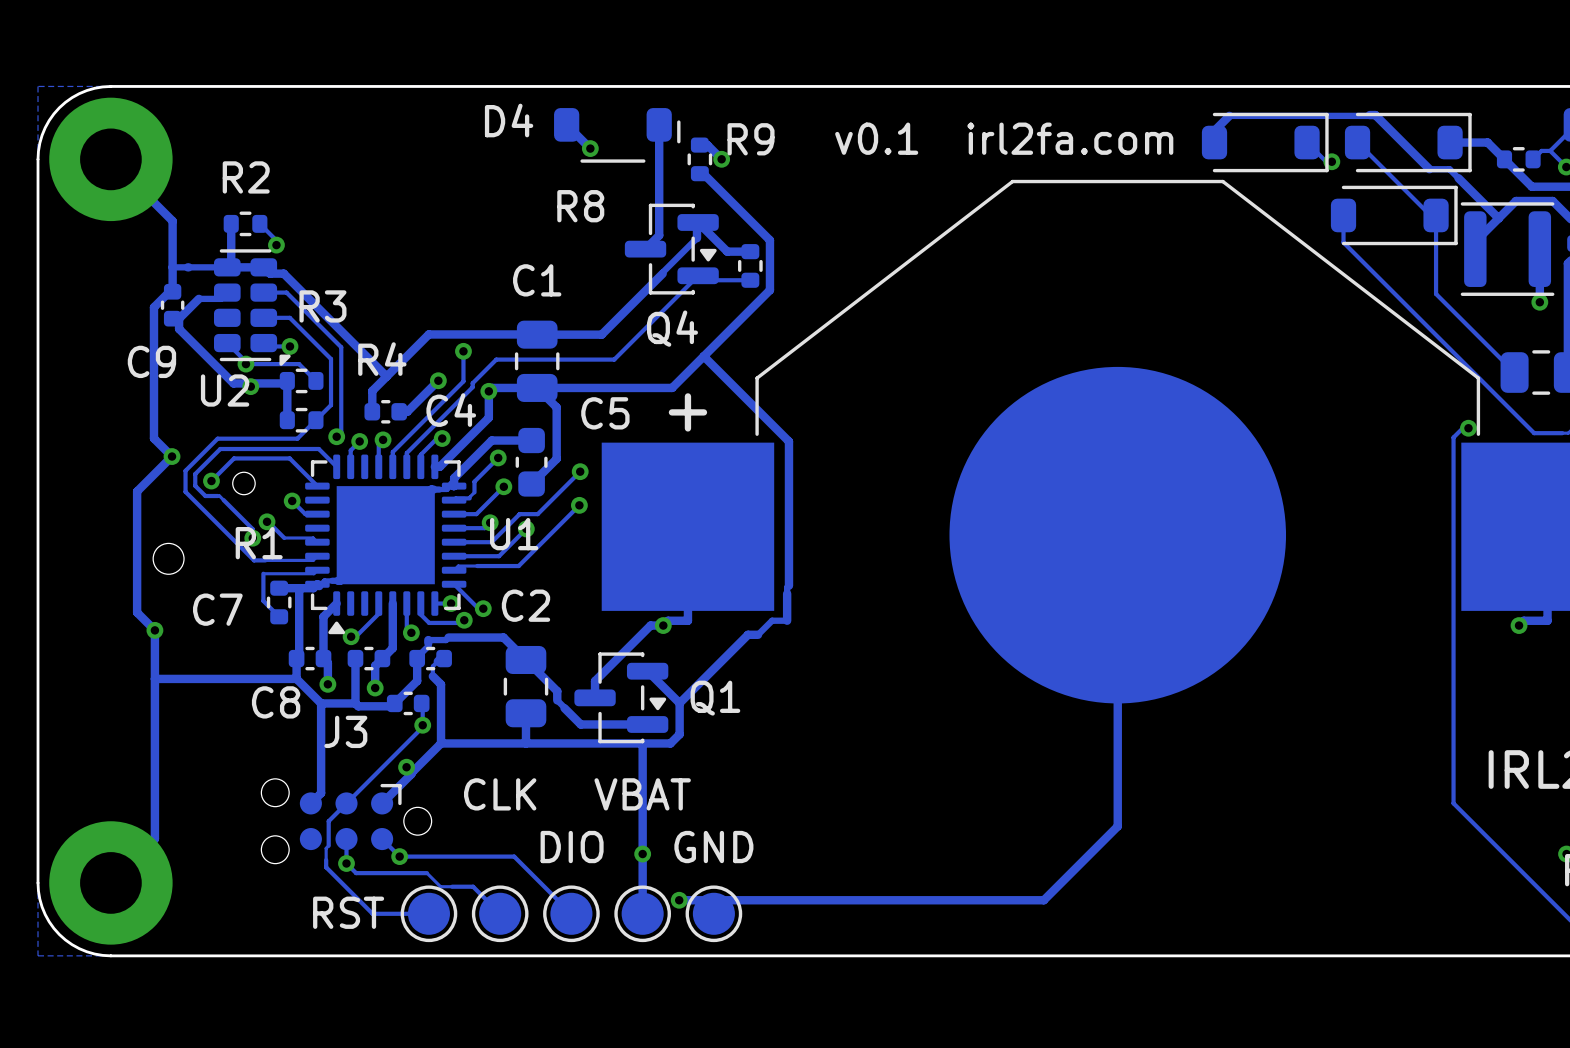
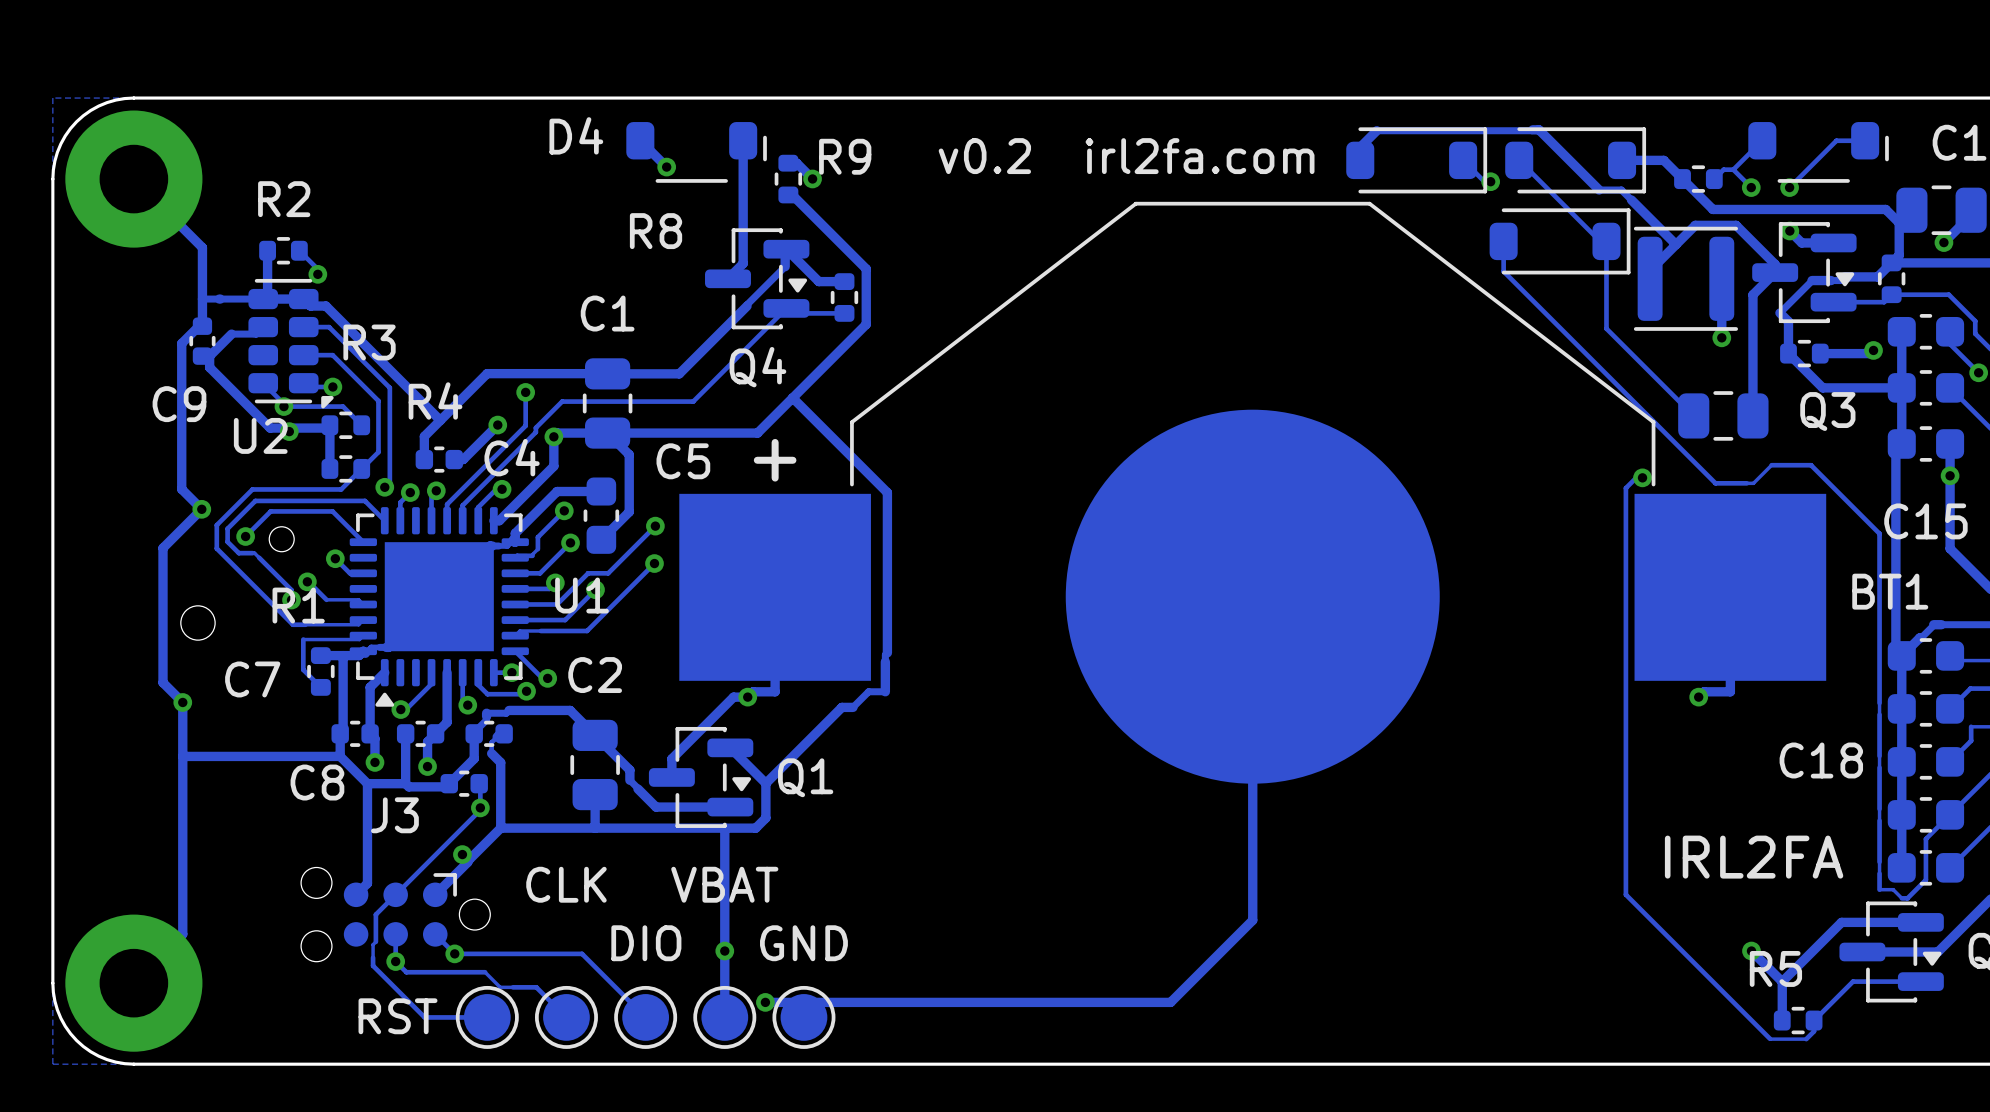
text: v0.1 irl2fa.com (1004, 138) -> v0.2 irl2fa.com (1126, 156)

